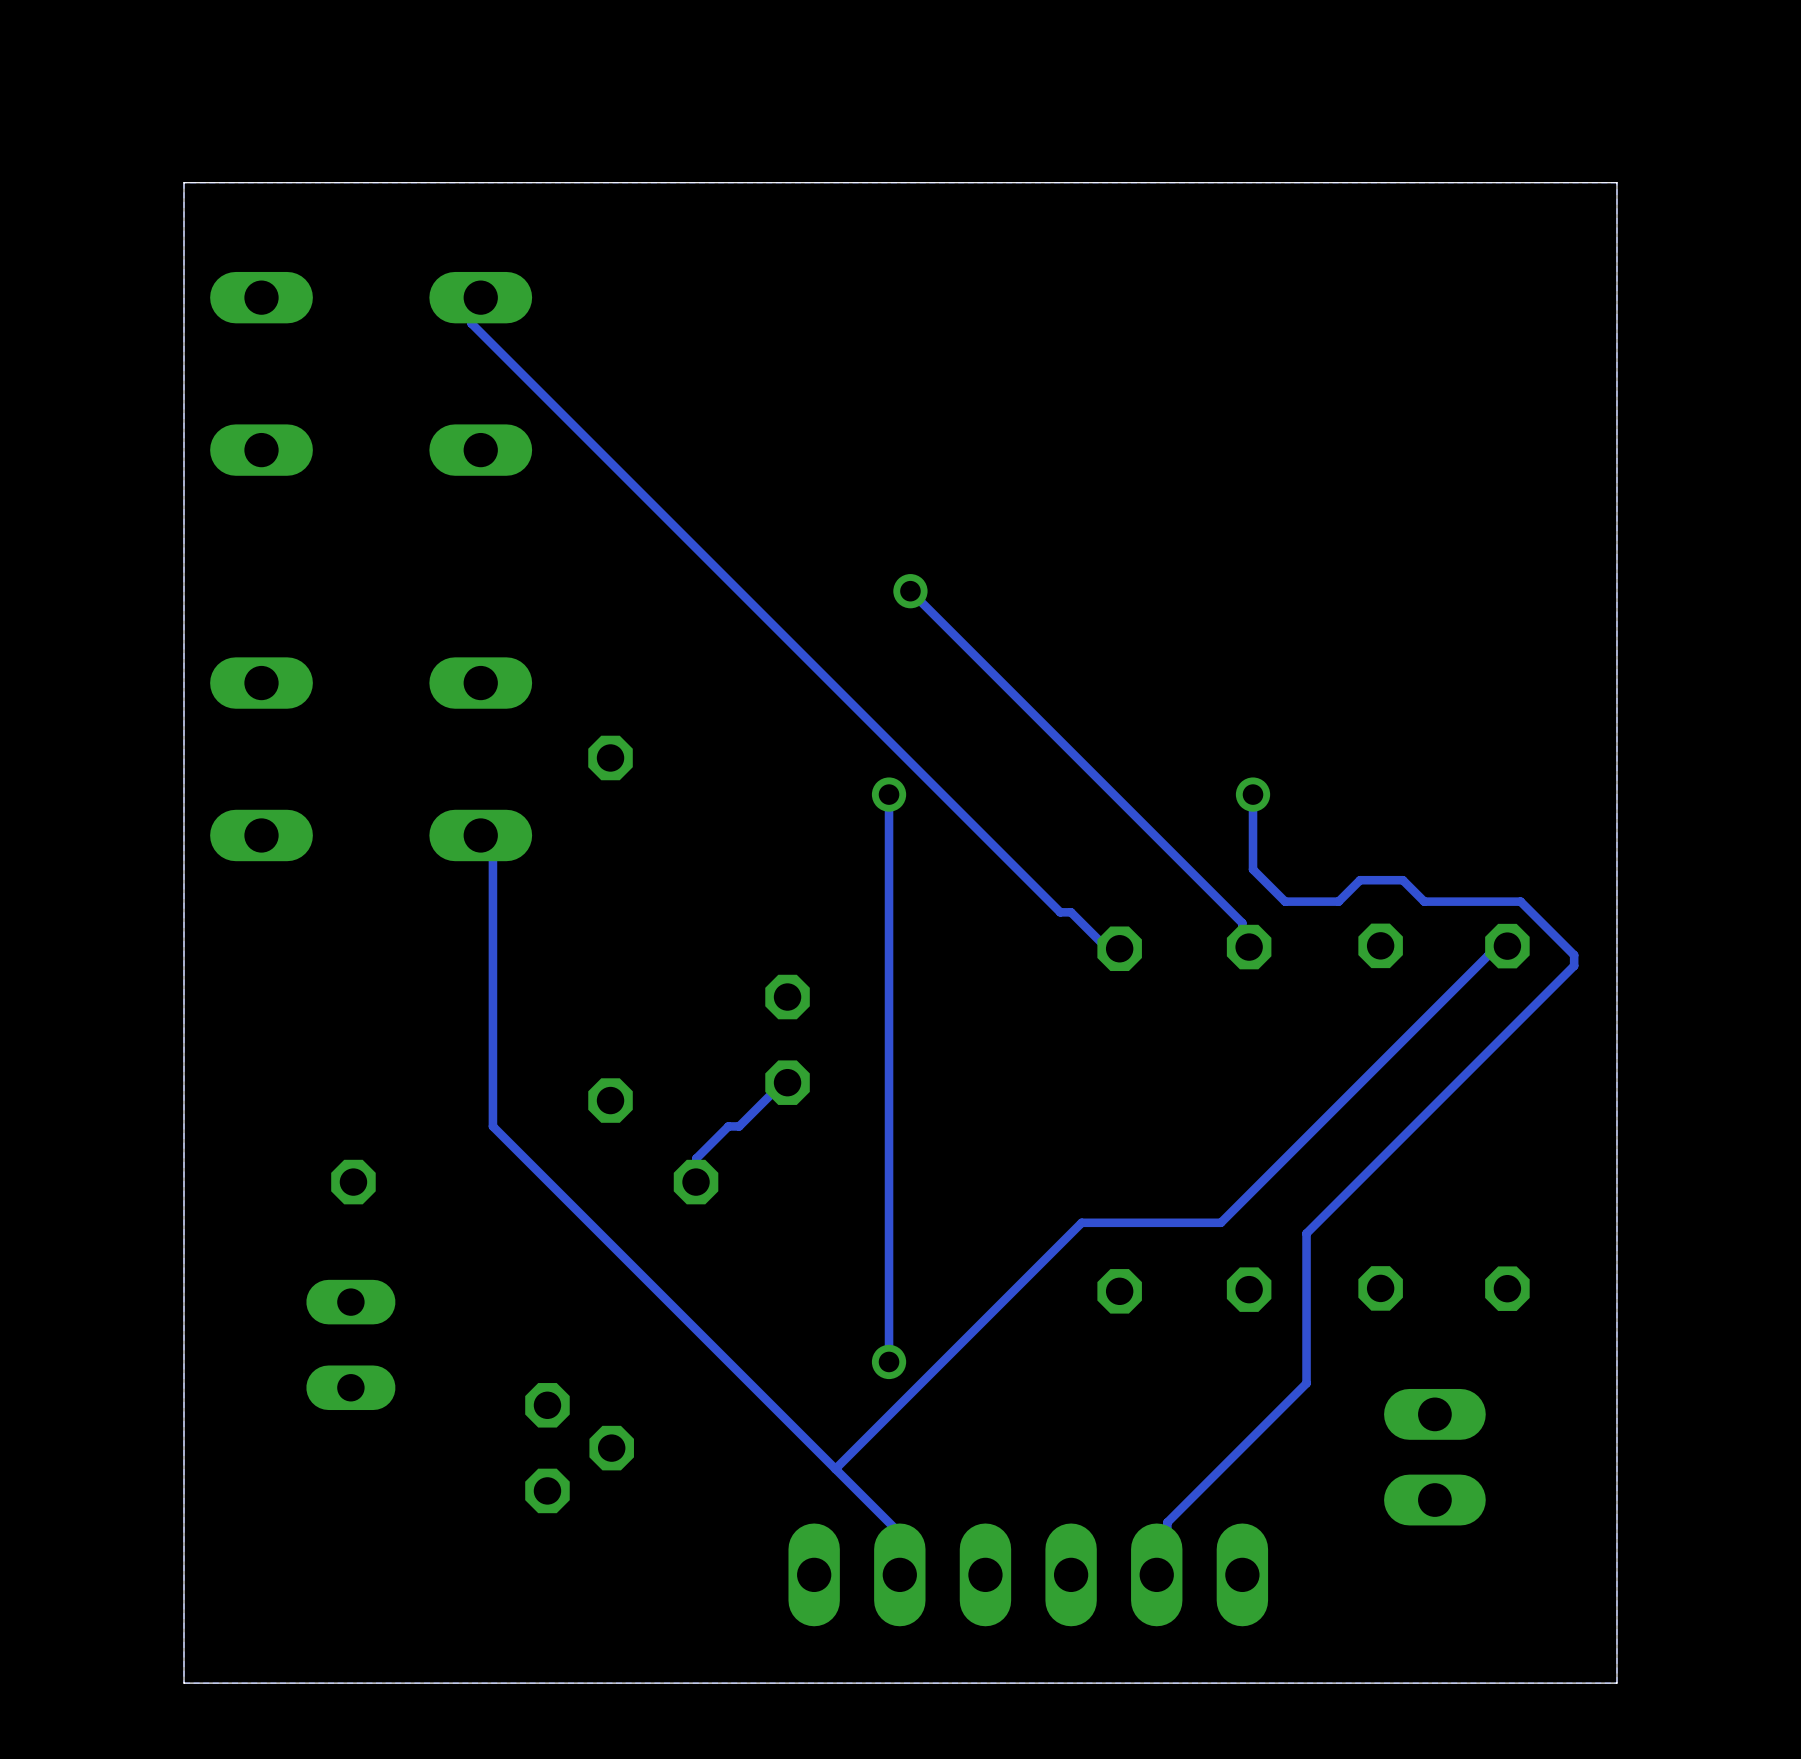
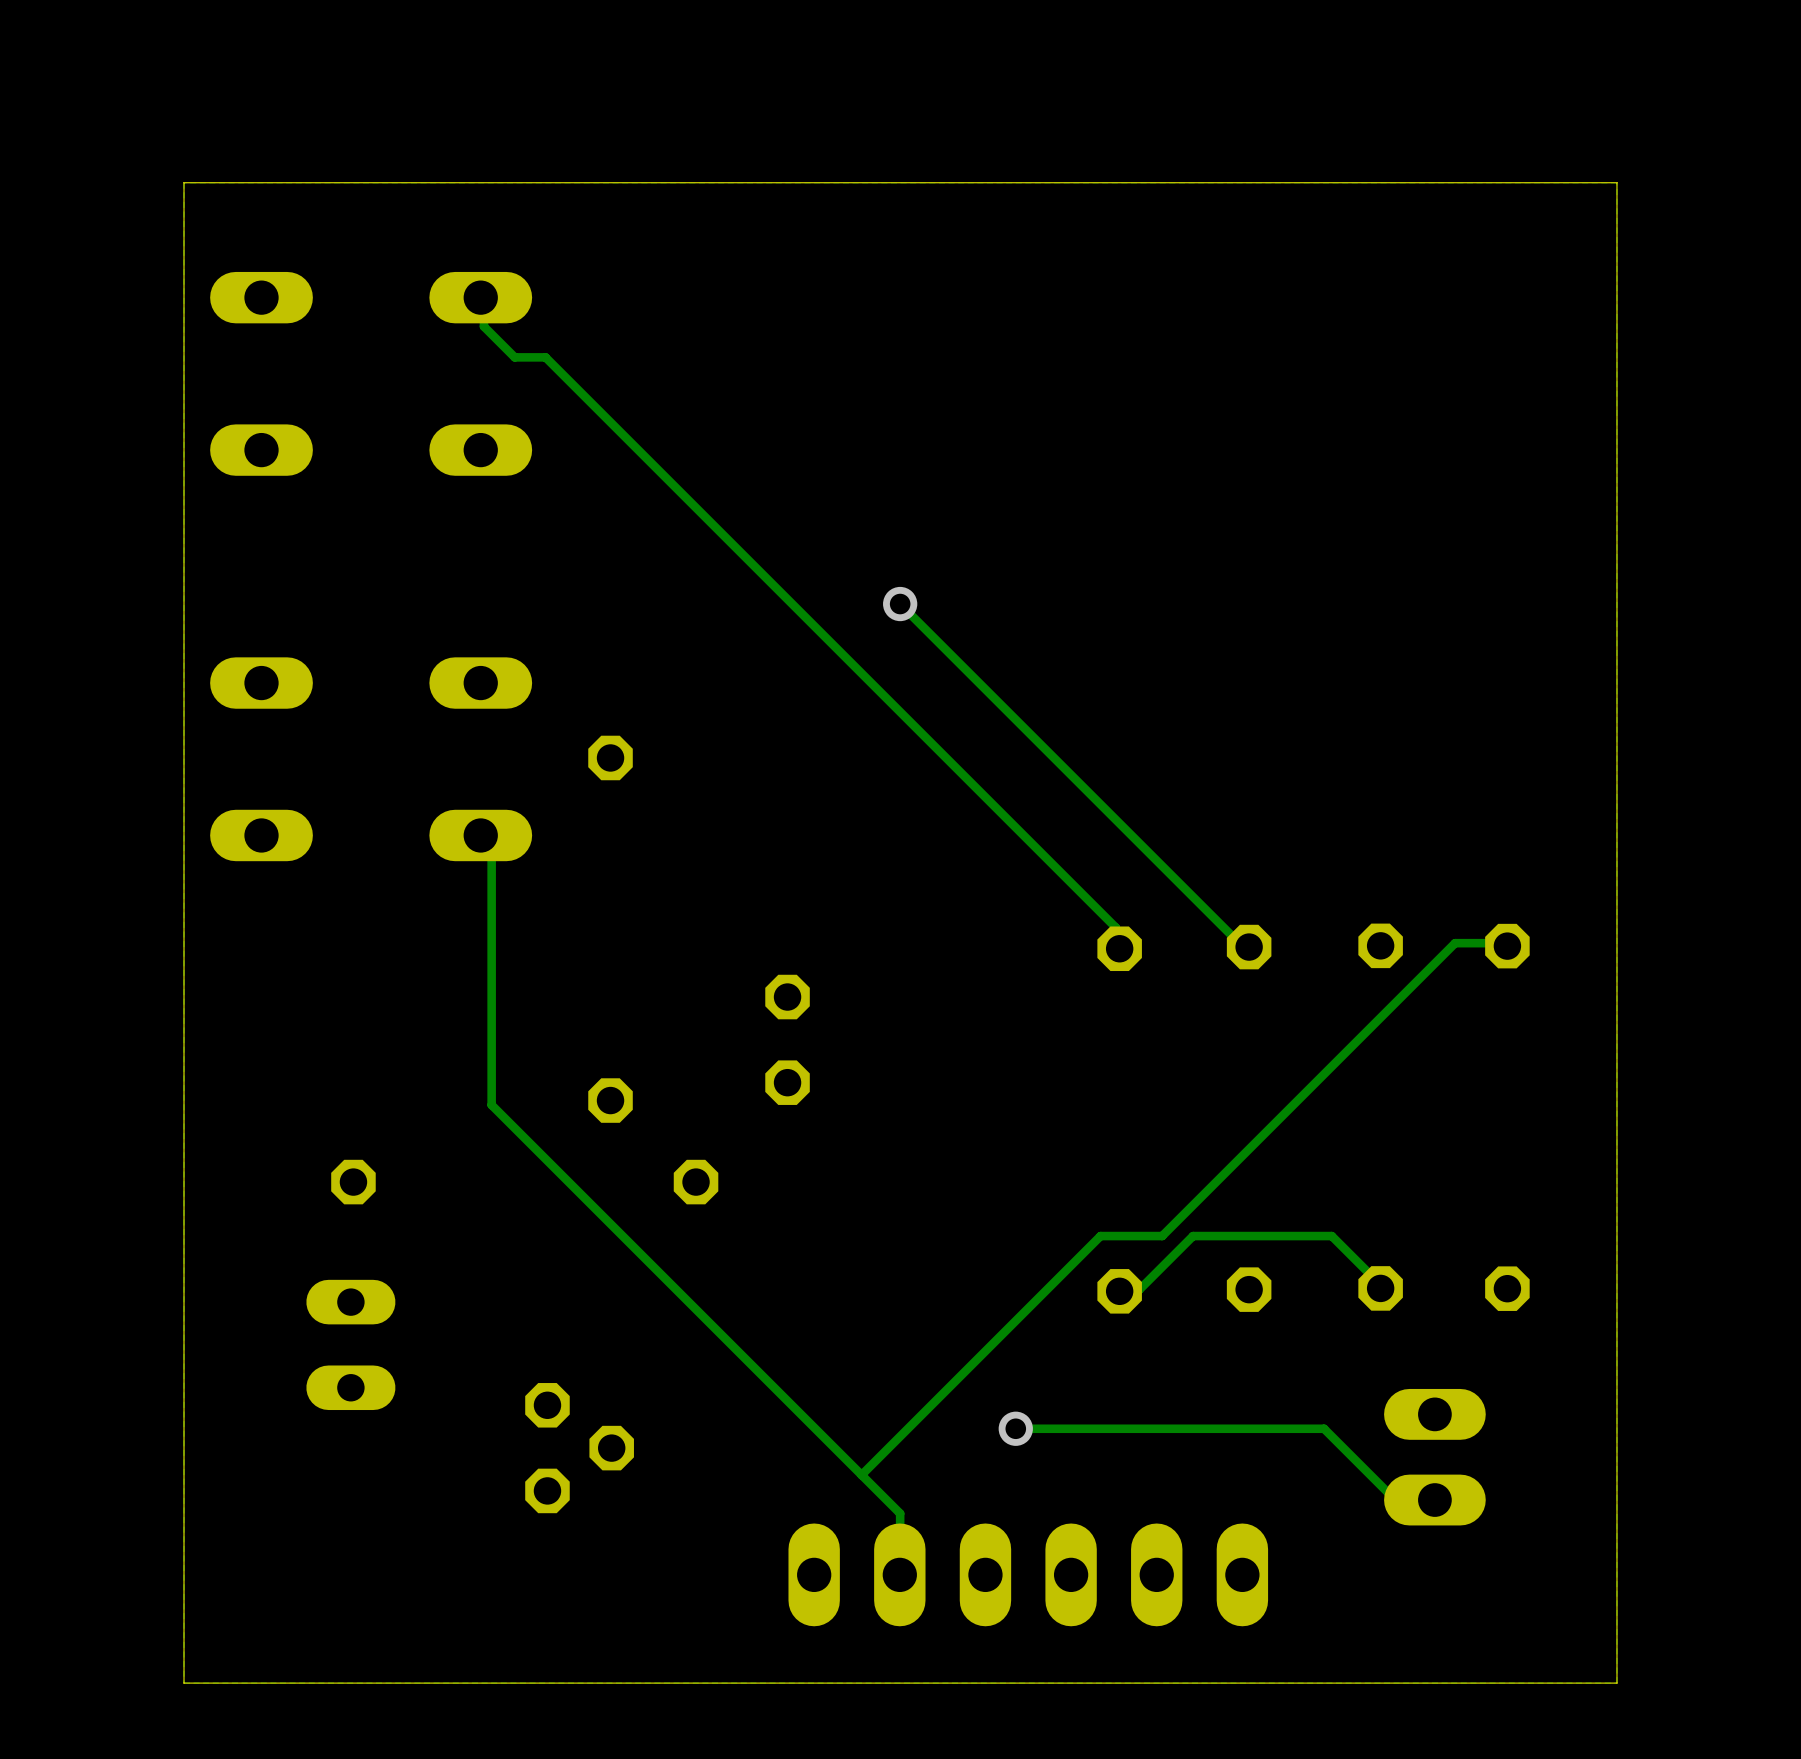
track: (480, 297) (471, 302) (471, 323) (1060, 912) (1071, 912) (1103, 944) (1113, 944) (1119, 948) -> (480, 297) (483, 303) (483, 326) (514, 357) (545, 357) (1115, 927) (1115, 943) (1119, 948)
track: (910, 591) (1242, 923) (1242, 944) (1249, 947) -> (900, 604) (1247, 950) (1249, 947)
via position: (910, 591) -> (900, 604)
track: (889, 794) (889, 1361) -> none
via: (889, 794) -> none
track: (1253, 794) (1253, 869) (1285, 901) (1338, 901) (1360, 880) (1402, 880) (1424, 901) (1520, 901) (1574, 955) (1574, 965) (1306, 1233) (1306, 1383) (1167, 1522) (1167, 1565) (1156, 1574) -> none
via: (1253, 794) -> none
track: (480, 835) (492, 848) (492, 1126) (899, 1533) (899, 1574) -> (480, 835) (483, 842) (491, 850) (491, 1105) (900, 1513) (899, 1574)
track: (1507, 946) (1499, 955) (1488, 955) (1220, 1222) (1081, 1222) (835, 1469) -> (1507, 946) (1501, 943) (1455, 943) (1162, 1236) (1100, 1236) (861, 1475)
track: (787, 1082) (781, 1083) (739, 1126) (728, 1126) (696, 1158) (696, 1182) -> none
track: none -> (1380, 1288) (1378, 1282) (1331, 1236) (1193, 1236) (1139, 1290) (1119, 1291)
via position: (889, 1361) -> (1015, 1428)
track: none -> (1015, 1428) (1324, 1428) (1393, 1498) (1432, 1498) (1434, 1500)

